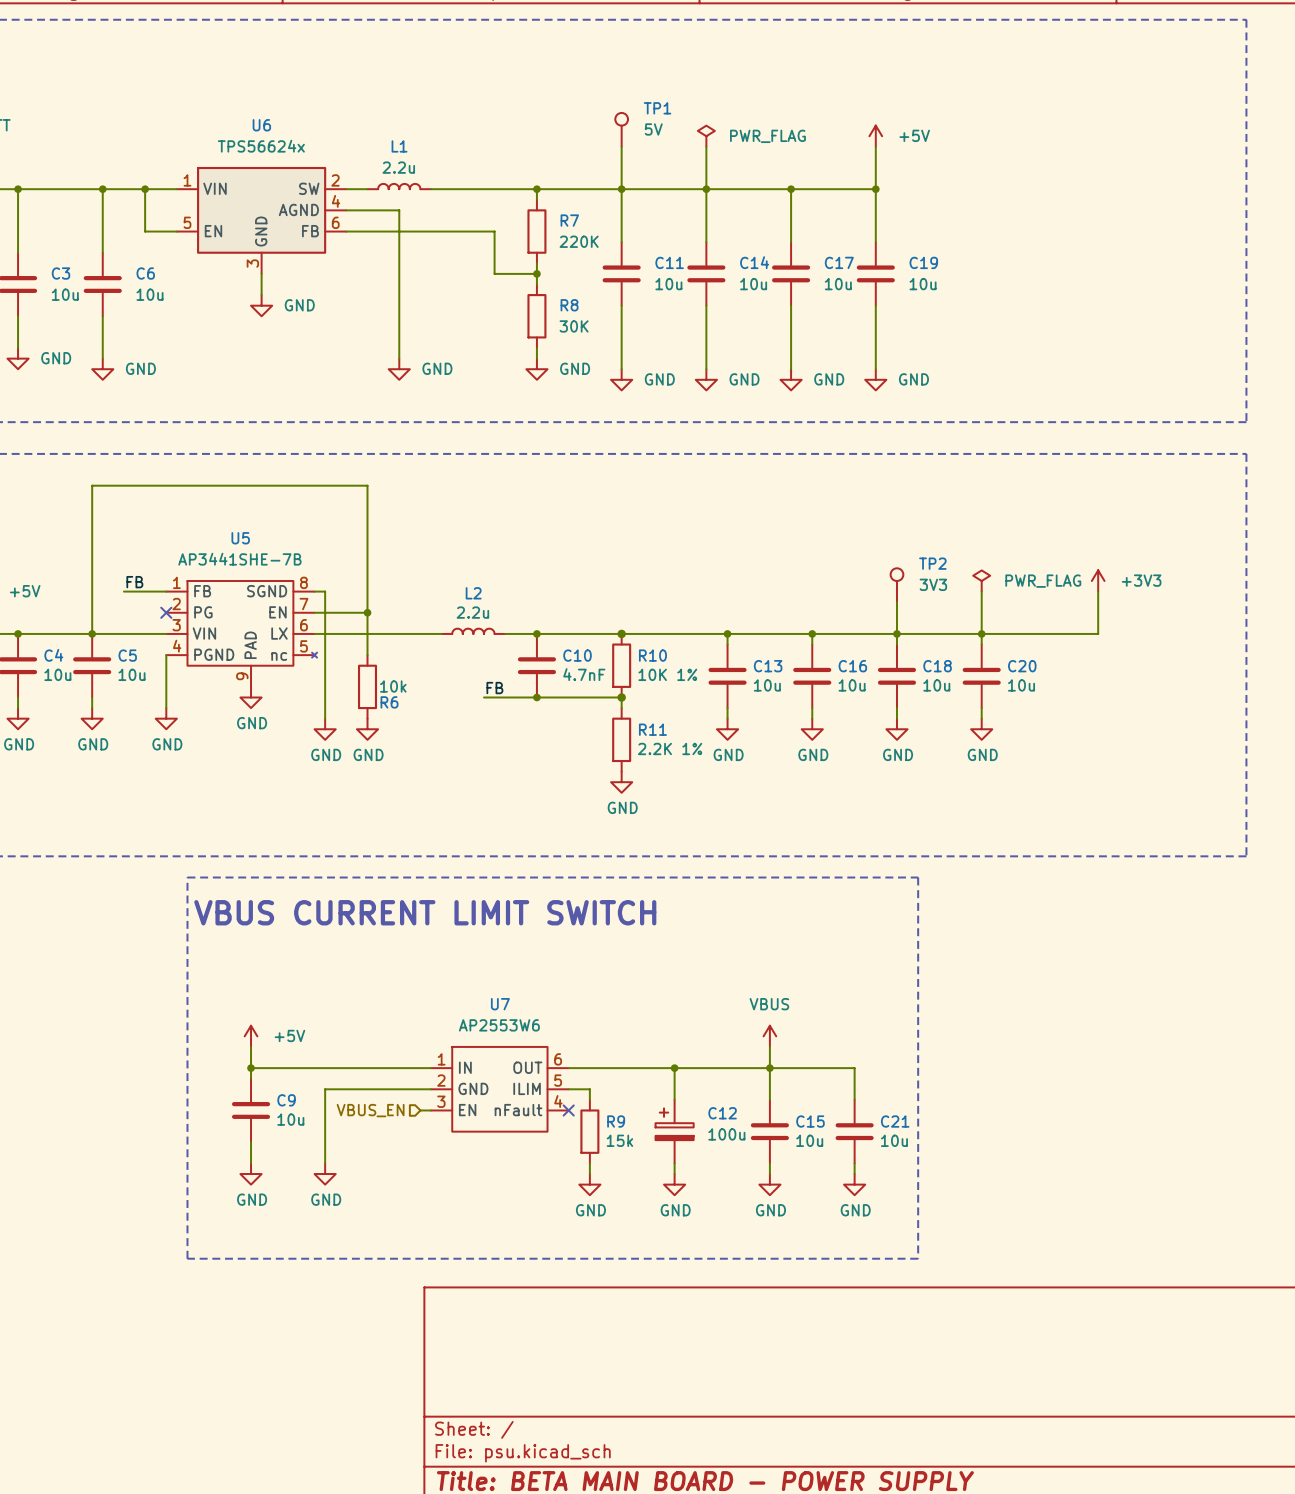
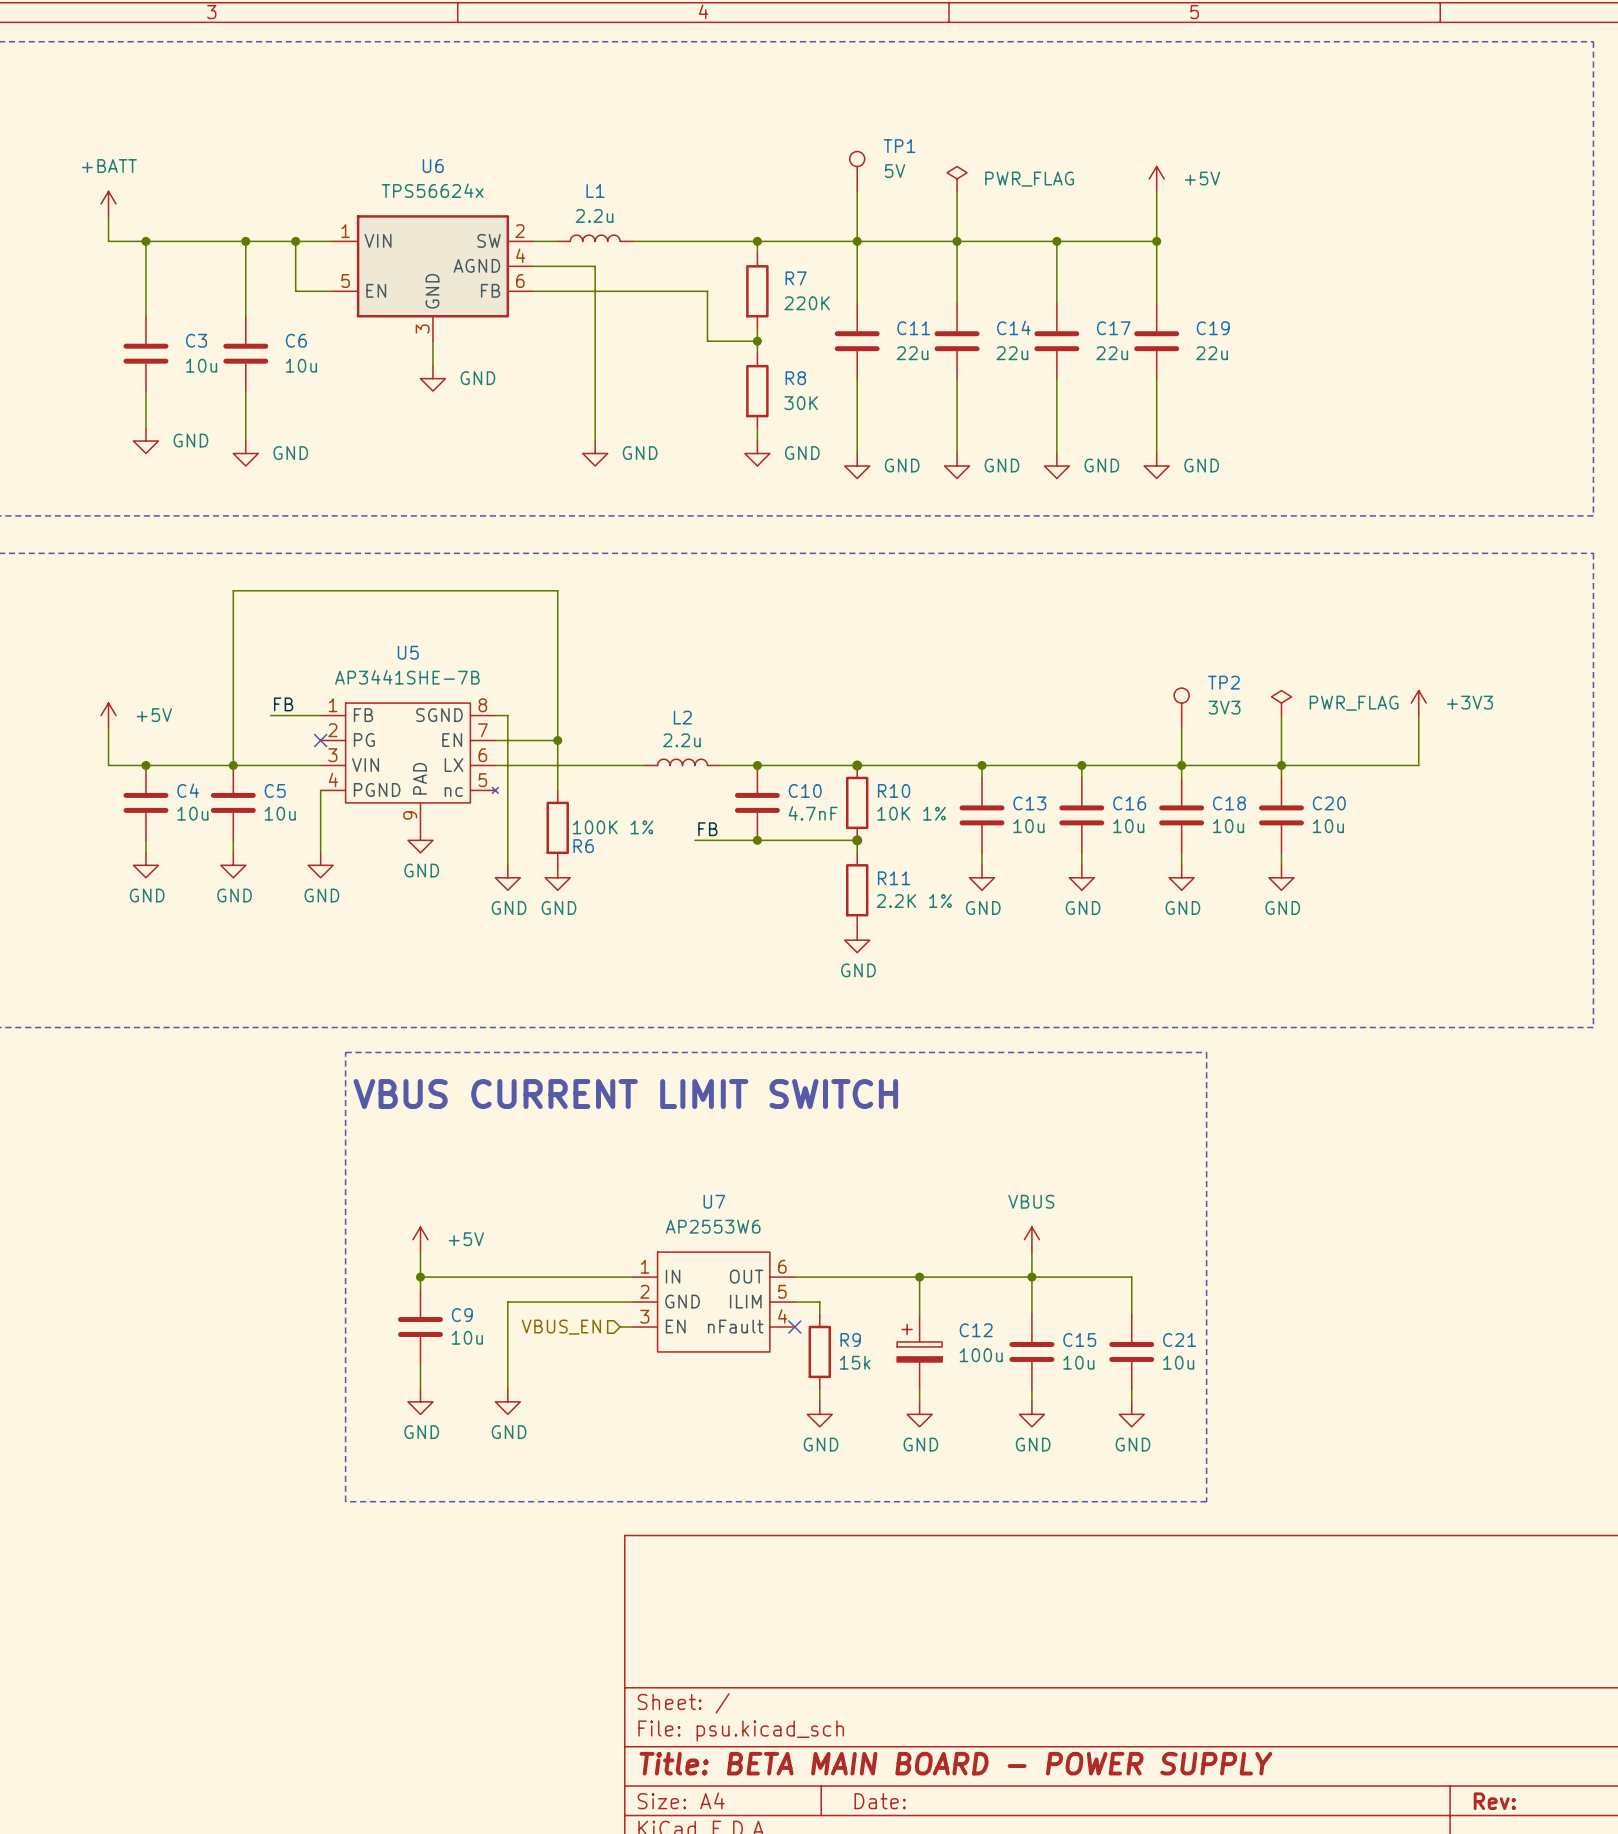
C11 value: 10u (668, 284) -> 22u (912, 353)
C14 value: 10u (753, 284) -> 22u (1012, 353)
C17 value: 10u (838, 284) -> 22u (1112, 353)
C19 value: 10u (923, 284) -> 22u (1212, 353)
R6 value: 10k (393, 686) -> 100K 1% (613, 827)

